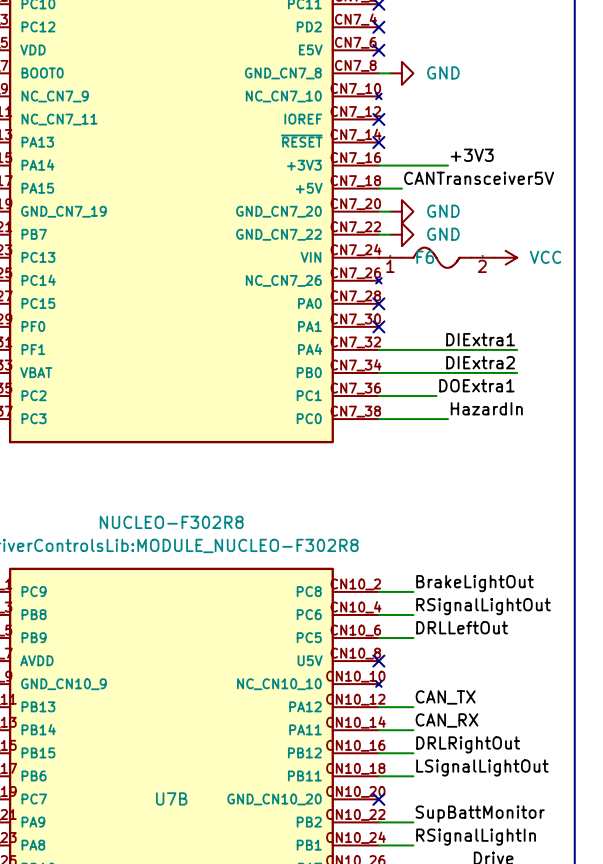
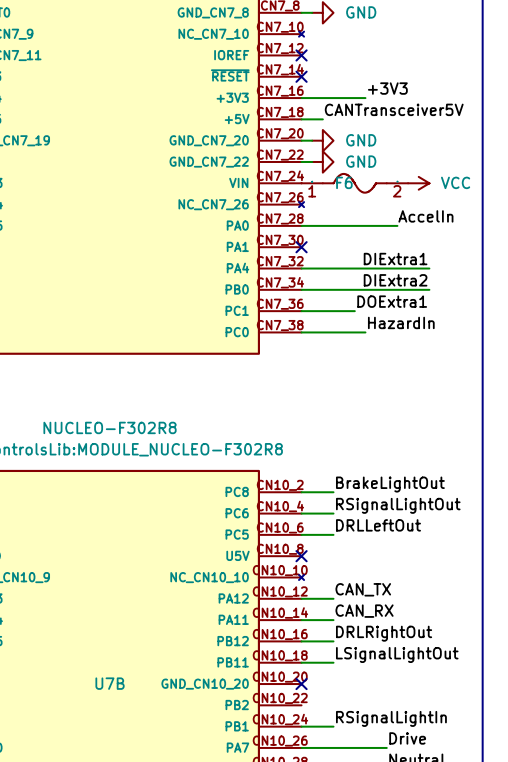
label: none -> AccelIn (425, 216)
wire: none -> (301, 225) (397, 225)
no-connect mark: (378, 303) -> none
label: SupBattMonitor (480, 814) -> none
wire: (378, 822) (413, 822) -> none

